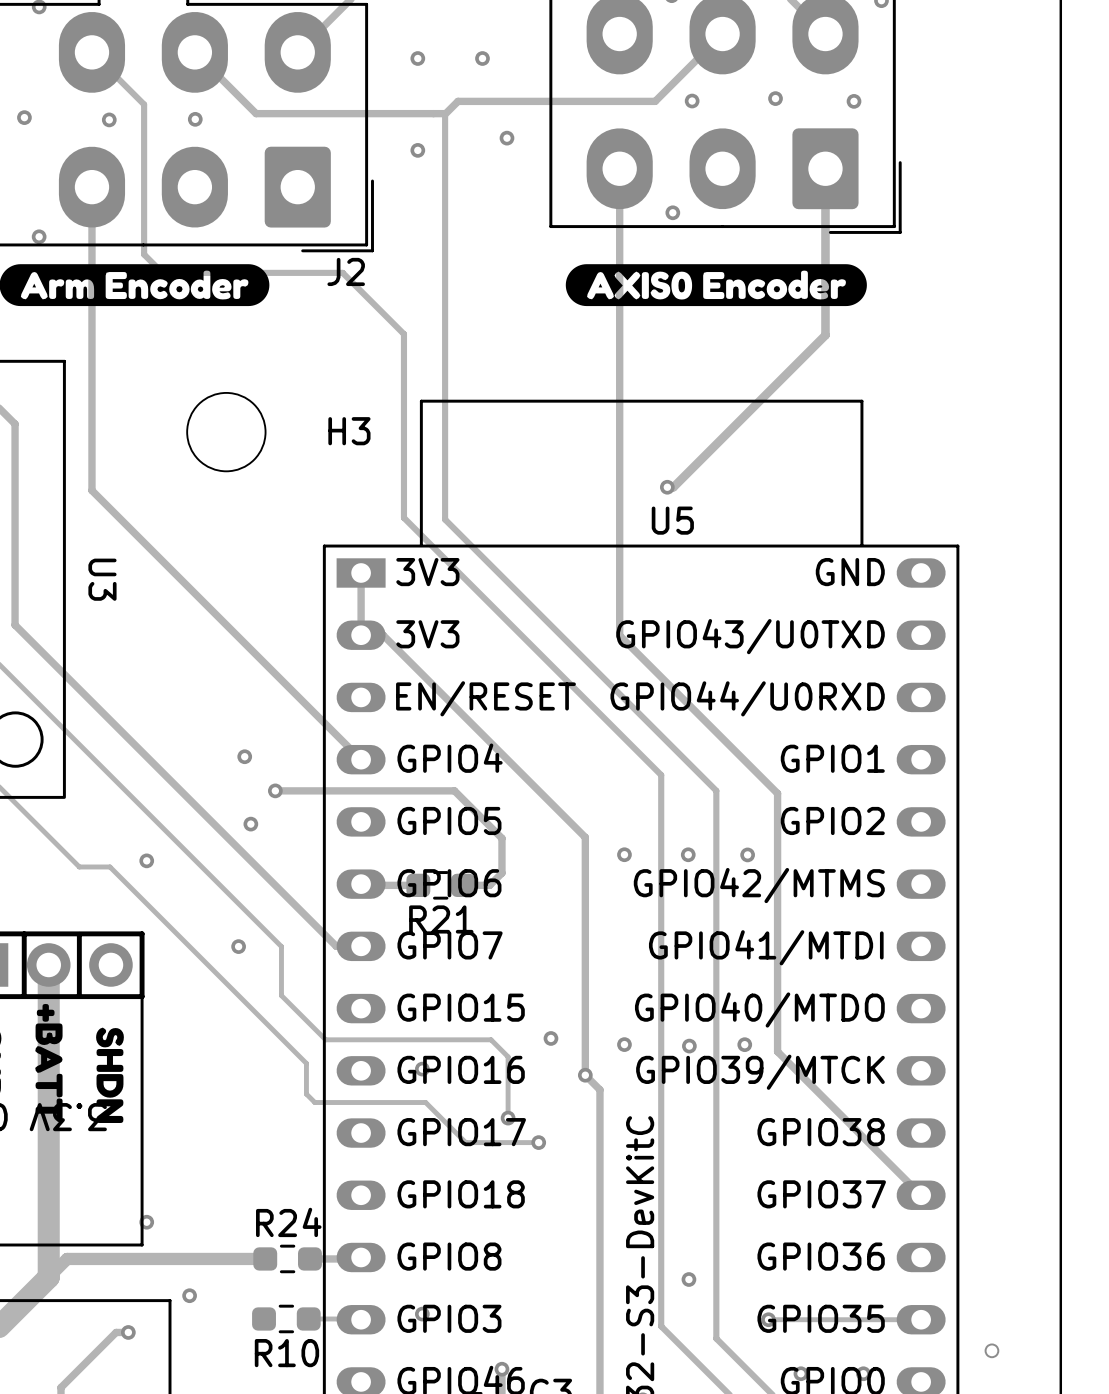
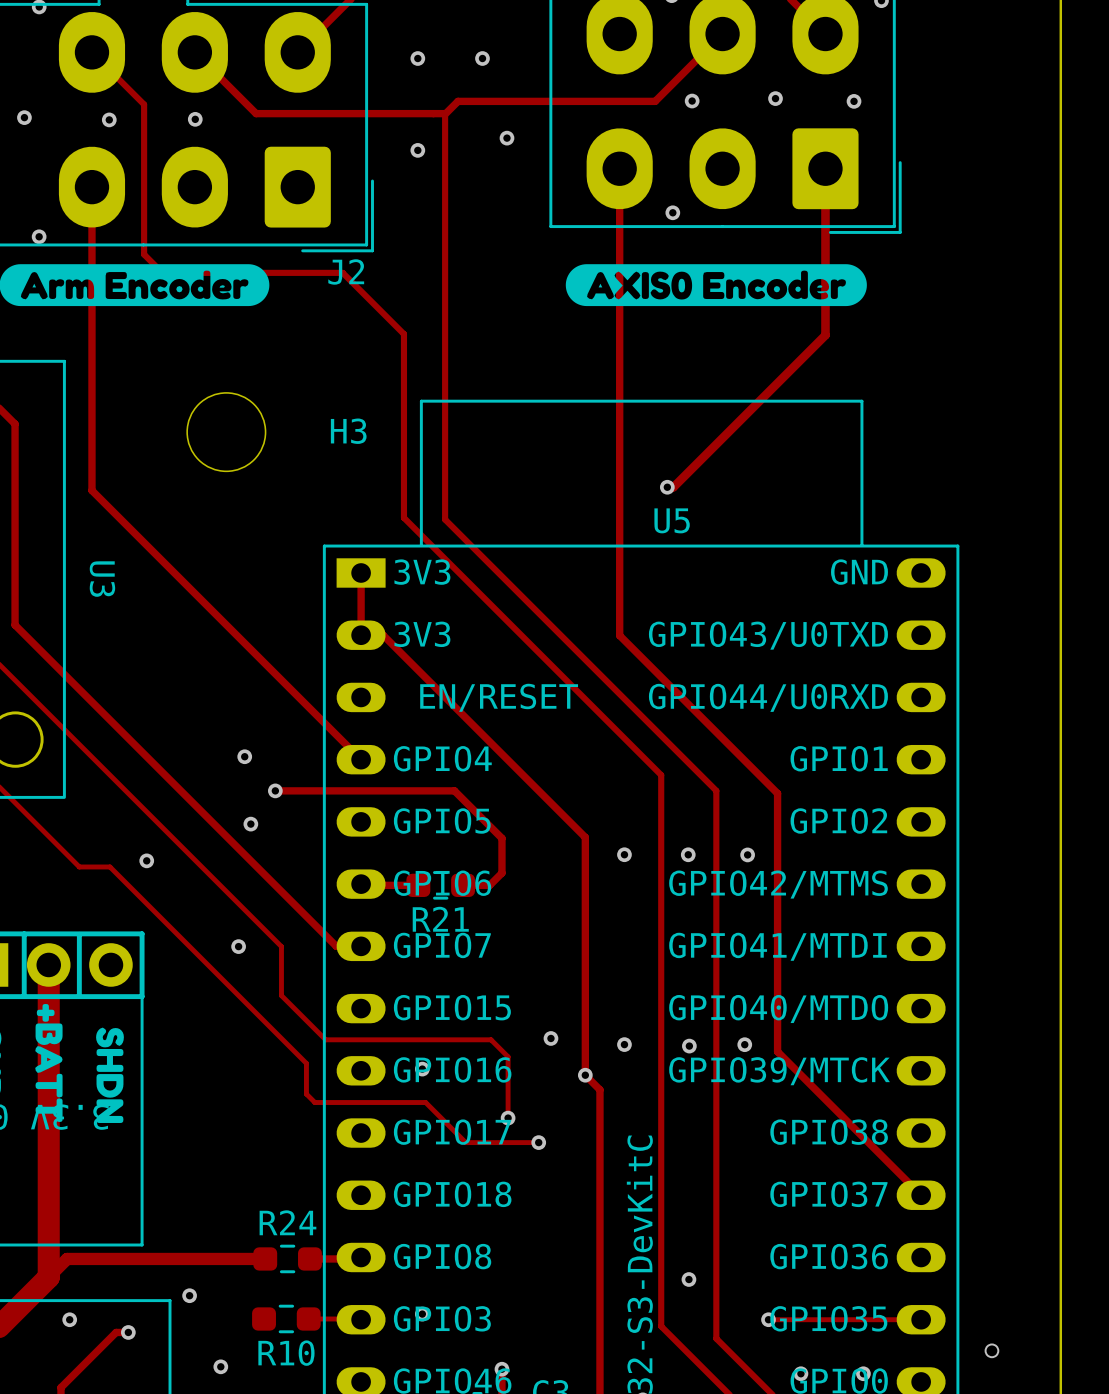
via: (146, 1222) -> none
via: none -> (69, 1319)
via: none -> (220, 1366)

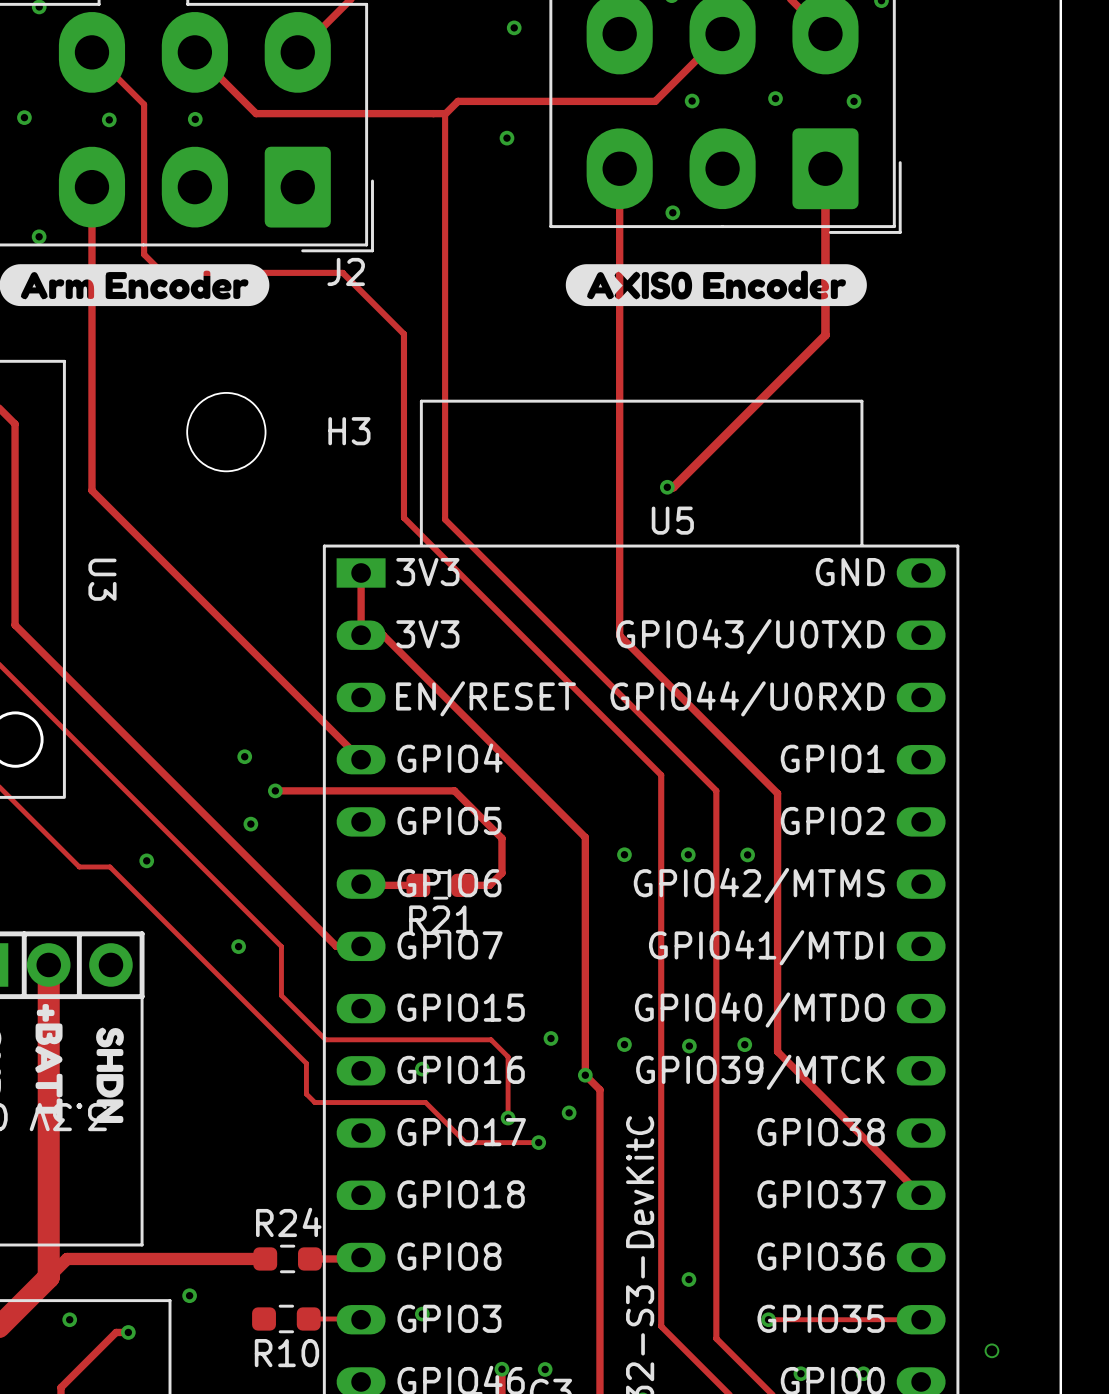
via: (417, 58) -> none
via position: (482, 58) -> (514, 27)
via: (417, 150) -> none
via: none -> (569, 1112)
via: (220, 1366) -> none
via: none -> (545, 1369)

